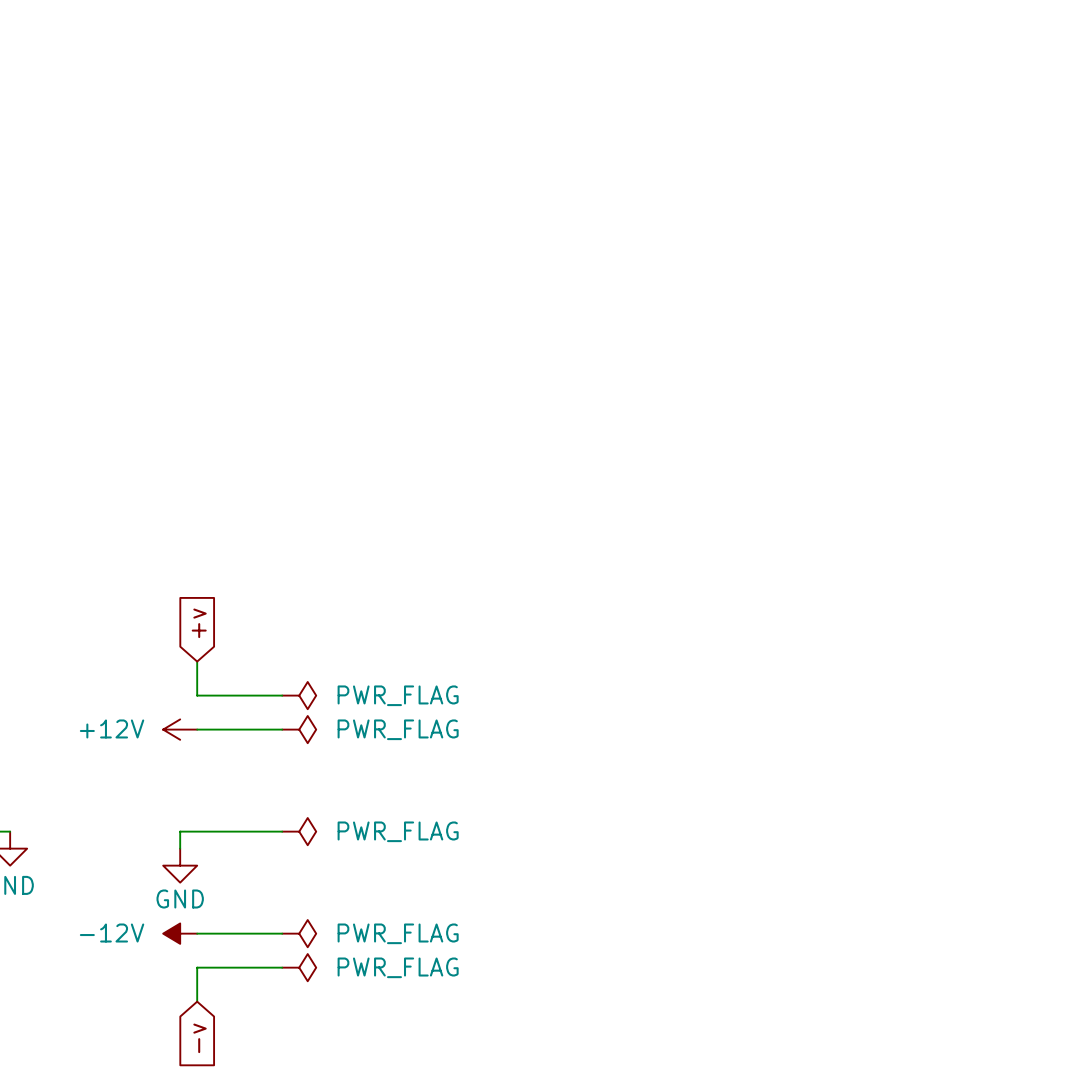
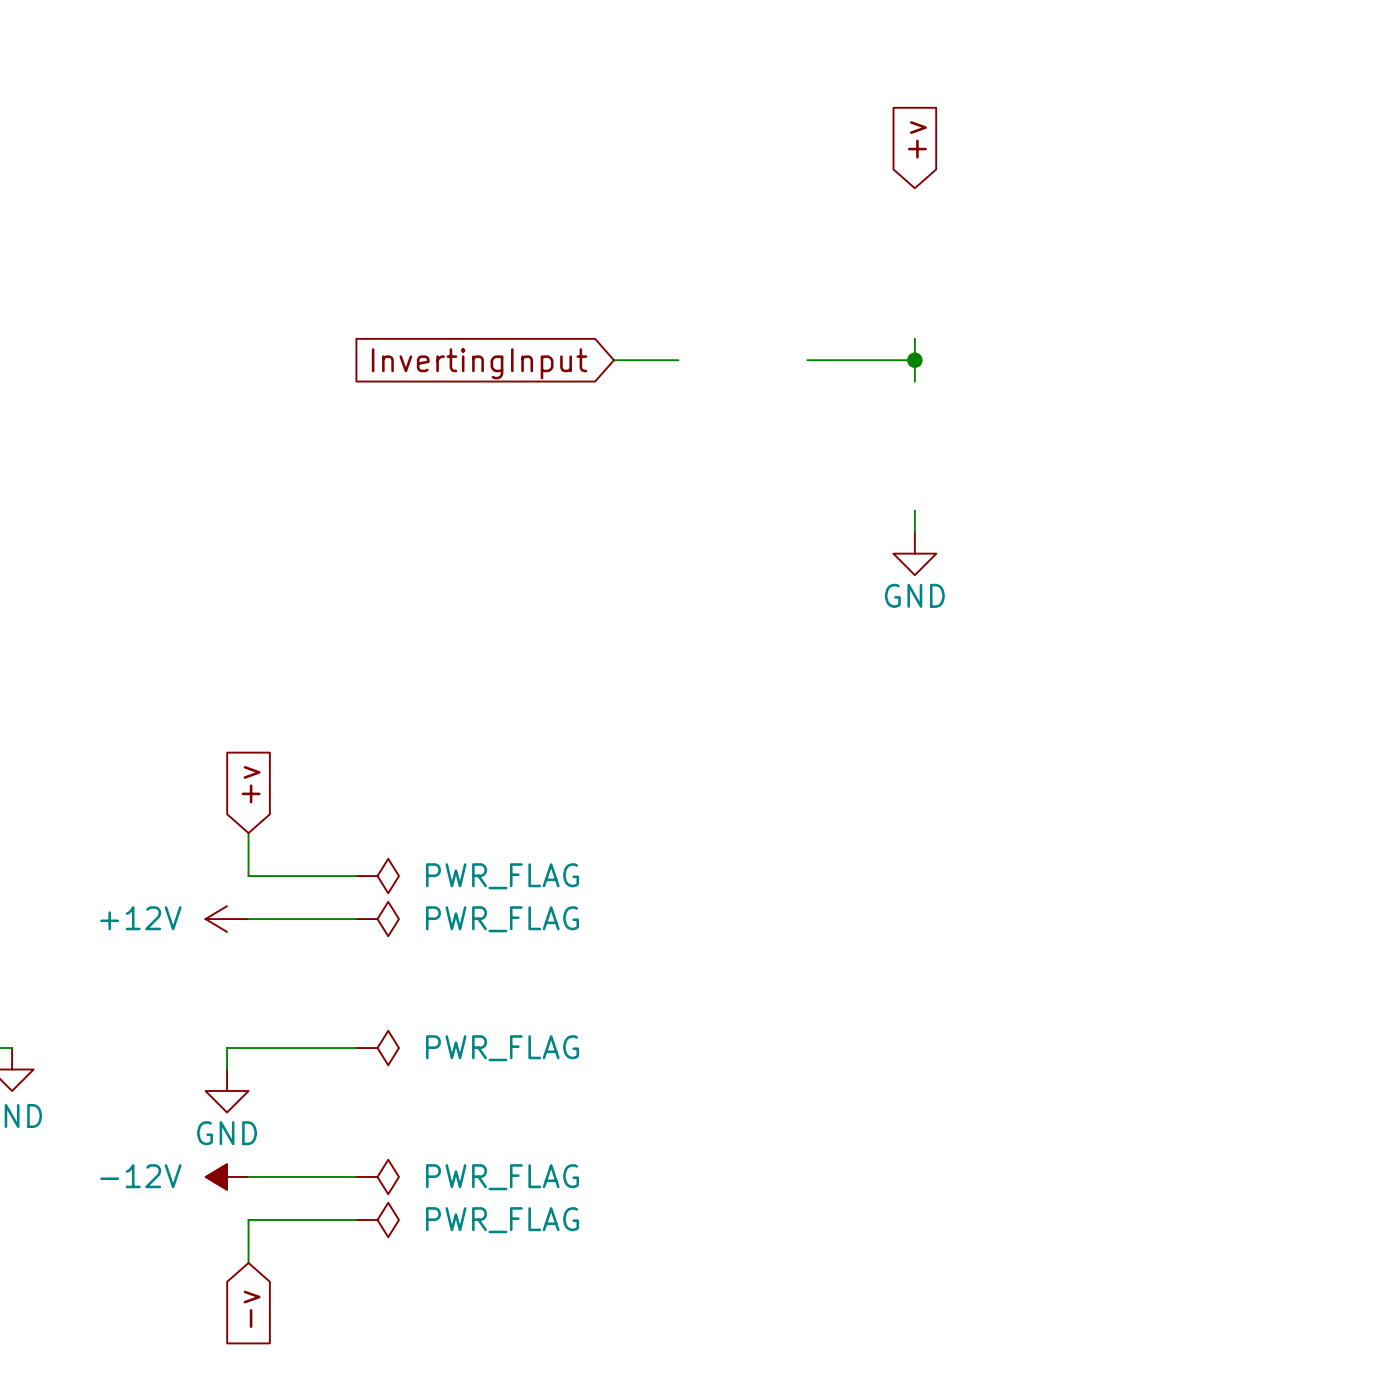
global label: none -> +v (917, 139)
wire: none -> (914, 338) (914, 381)
wire: none -> (613, 360) (678, 360)
wire: none -> (807, 360) (914, 360)
junction: none -> (914, 360)
global label: none -> InvertingInput (479, 363)
wire: none -> (914, 510) (914, 532)
power symbol: none -> GND (914, 553)

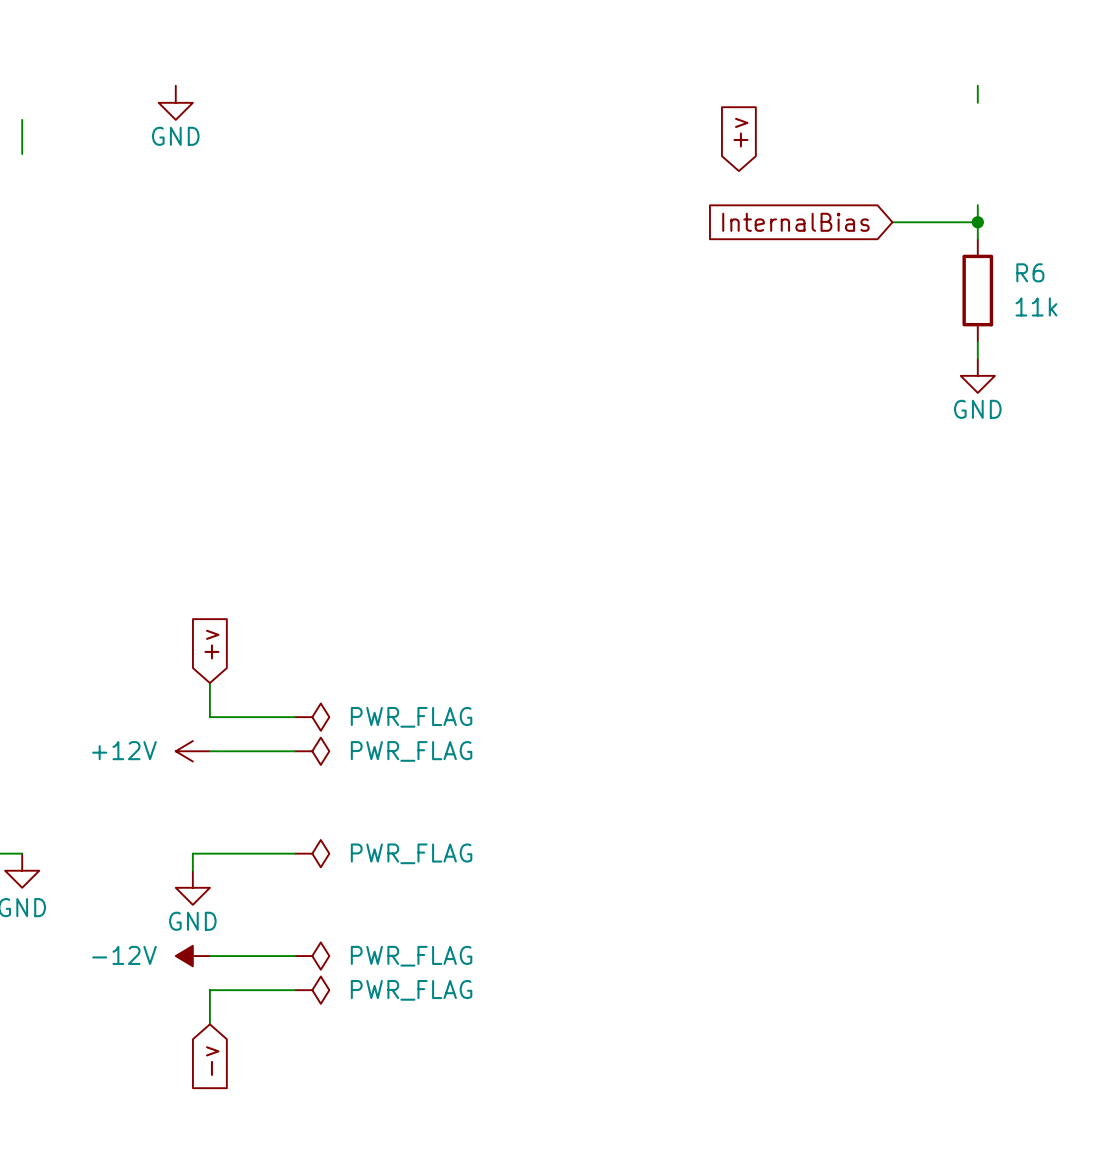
wire: none -> (977, 85) (977, 102)
power symbol: none -> GND (175, 102)
wire: none -> (22, 119) (22, 154)
global label: none -> InternalBias (795, 222)
junction: none -> (977, 222)
wire: (914, 338) (914, 381) -> (977, 205) (977, 239)
R6: none -> 11k (977, 290)
wire: (613, 360) (678, 360) -> none
wire: (807, 360) (914, 360) -> (892, 222) (977, 222)
junction: (914, 360) -> none
global label: InvertingInput (479, 363) -> none
wire: (914, 510) (914, 532) -> (977, 341) (977, 358)
power symbol position: GND (914, 553) -> GND (977, 375)

